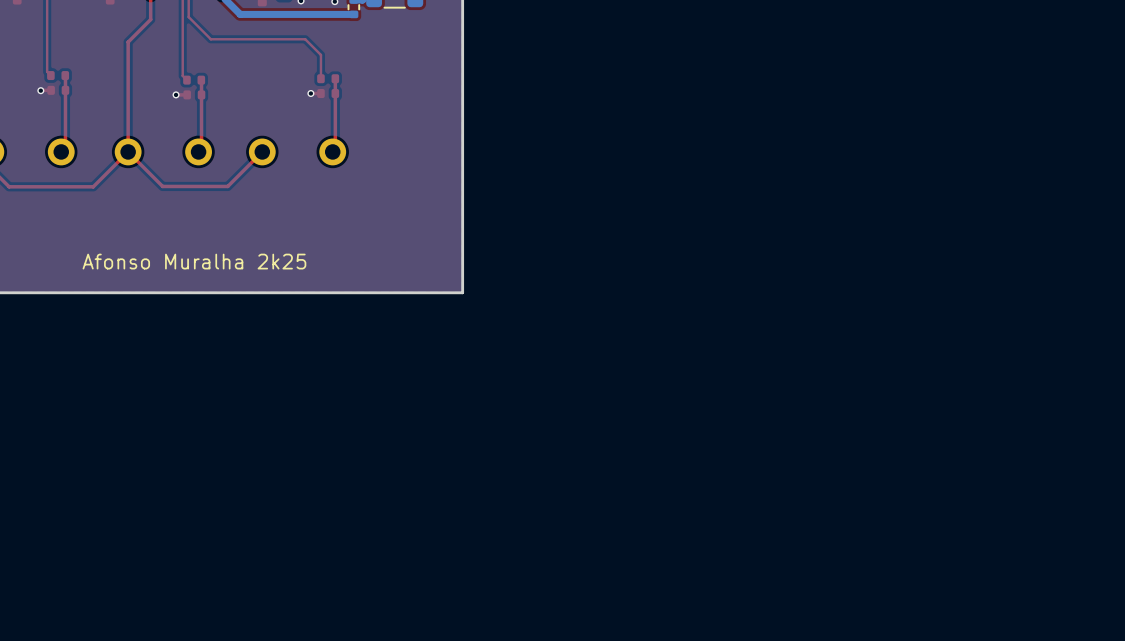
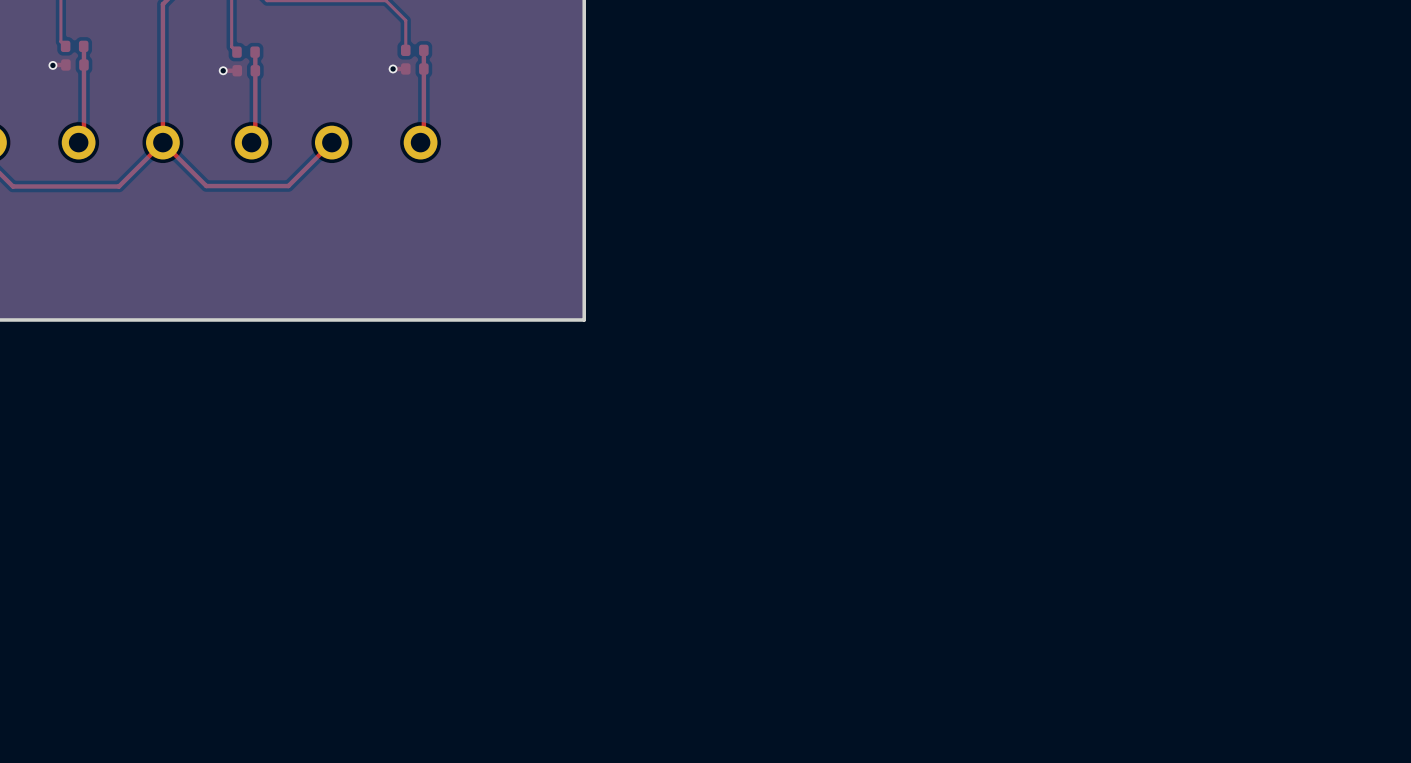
text: Afonso Muralha 2k25 (194, 261) -> none

